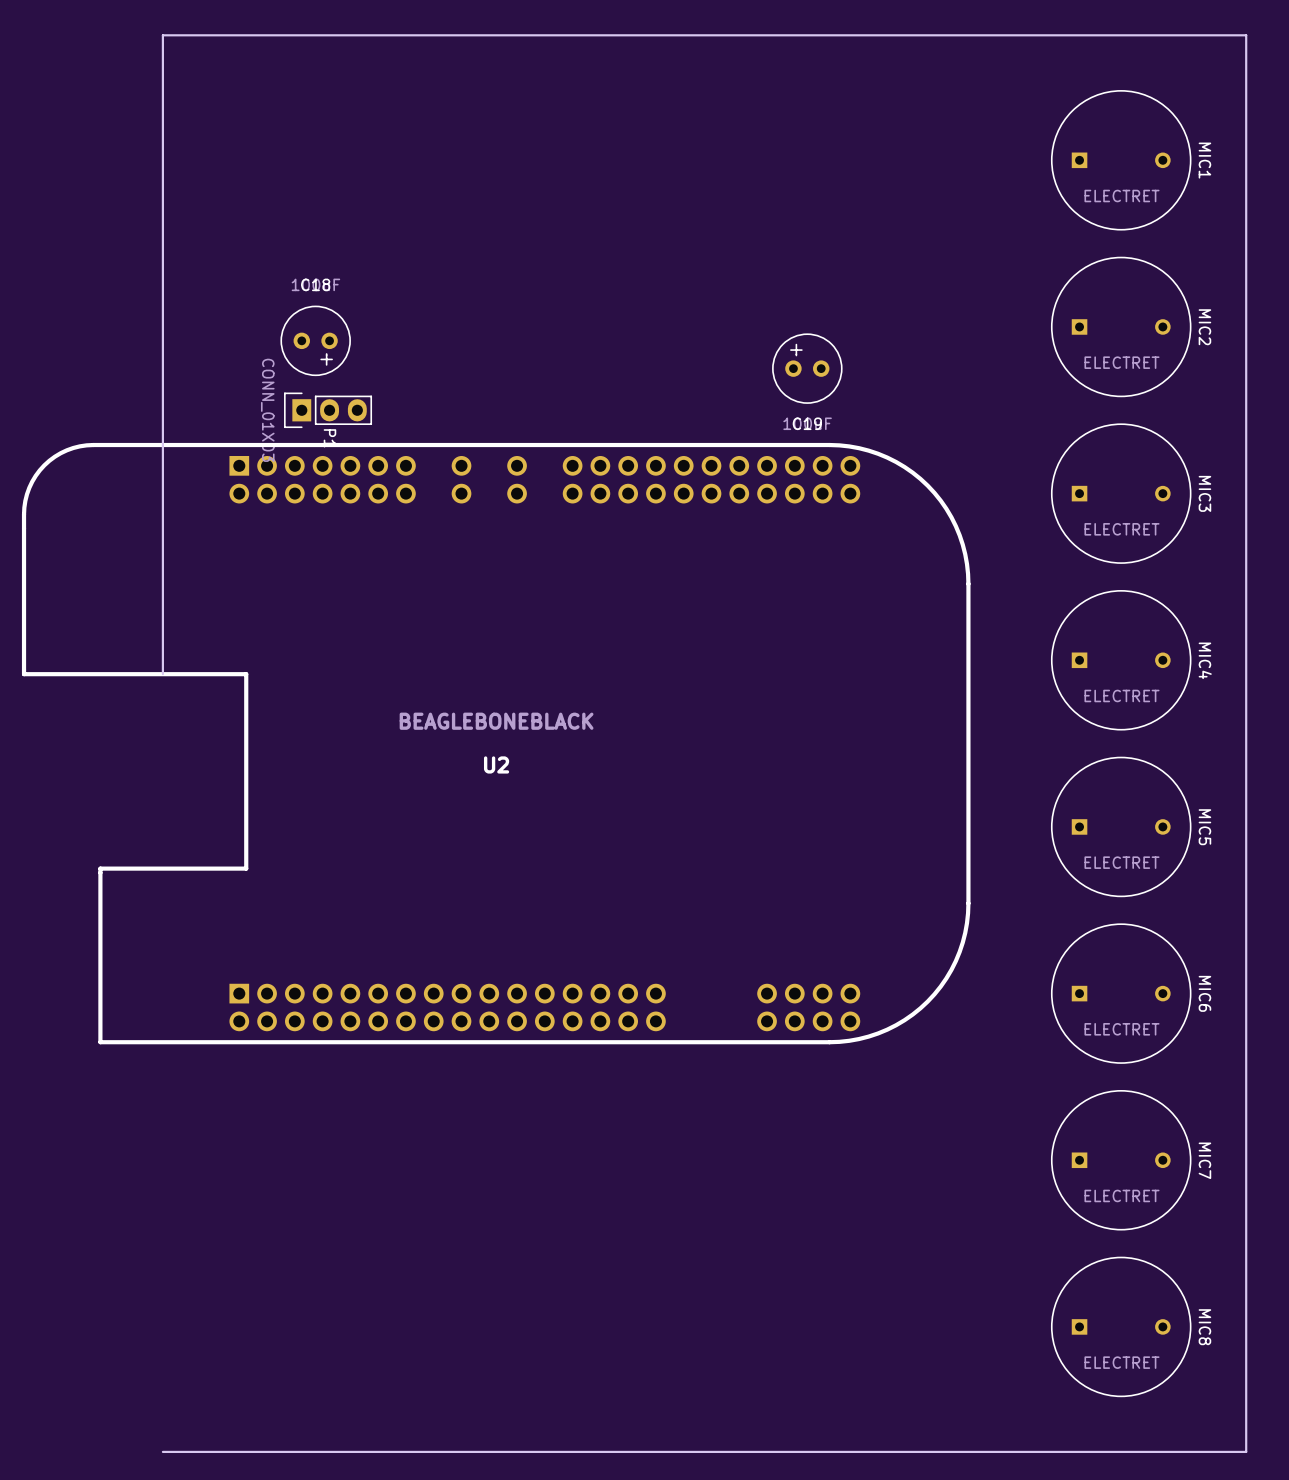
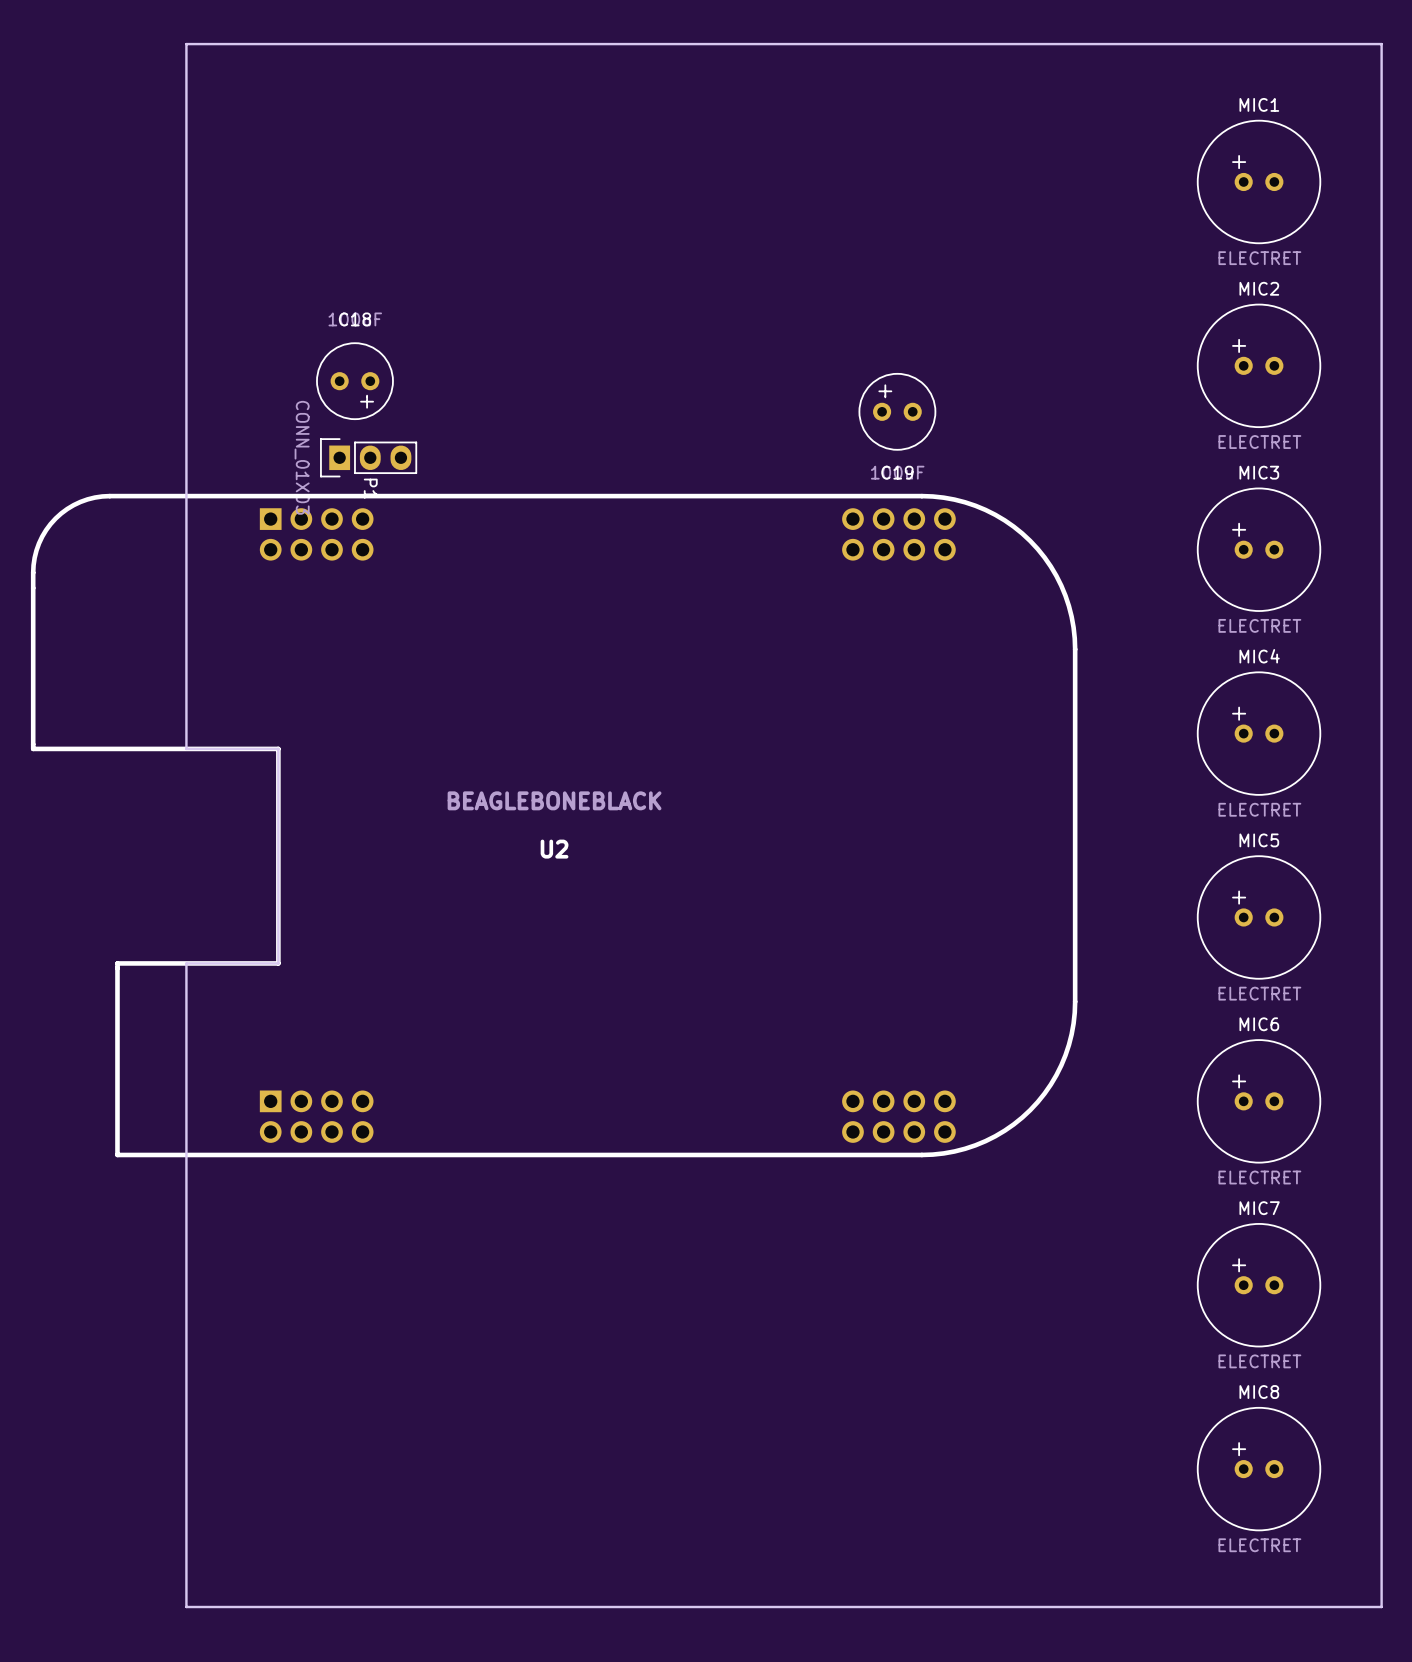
MIC1 footprint: [1050, 90, 1192, 231] -> [1196, 119, 1322, 245]
MIC1 name position: MIC1 (1204, 160) -> MIC1 (1259, 104)
MIC1 value position: ELECTRET (1121, 196) -> ELECTRET (1259, 258)
MIC2 footprint: [1050, 256, 1192, 398] -> [1196, 303, 1322, 429]
MIC2 name position: MIC2 (1204, 327) -> MIC2 (1259, 288)
MIC2 value position: ELECTRET (1121, 362) -> ELECTRET (1259, 442)
MIC3 footprint: [1050, 423, 1192, 564] -> [1196, 487, 1322, 612]
U2 footprint: [21, 442, 971, 1045] -> [30, 493, 1078, 1158]
MIC3 name position: MIC3 (1204, 493) -> MIC3 (1259, 472)
MIC3 value position: ELECTRET (1121, 529) -> ELECTRET (1259, 625)
MIC4 footprint: [1050, 590, 1192, 731] -> [1196, 671, 1322, 796]
MIC4 name position: MIC4 (1205, 660) -> MIC4 (1259, 656)
board edge: none -> (186, 748) (278, 748) (278, 963) (186, 963) (186, 1607)
MIC4 value position: ELECTRET (1121, 695) -> ELECTRET (1259, 809)
MIC5 footprint: [1050, 756, 1192, 898] -> [1196, 855, 1322, 980]
MIC5 name position: MIC5 (1204, 827) -> MIC5 (1259, 840)
MIC5 value position: ELECTRET (1121, 862) -> ELECTRET (1259, 993)
MIC6 footprint: [1050, 923, 1192, 1064] -> [1196, 1039, 1322, 1164]
MIC6 name position: MIC6 (1204, 993) -> MIC6 (1259, 1024)
MIC6 value position: ELECTRET (1121, 1029) -> ELECTRET (1259, 1177)
MIC7 footprint: [1050, 1090, 1192, 1231] -> [1196, 1223, 1322, 1348]
MIC7 name position: MIC7 (1204, 1160) -> MIC7 (1259, 1208)
MIC7 value position: ELECTRET (1121, 1195) -> ELECTRET (1259, 1361)
MIC8 footprint: [1050, 1256, 1192, 1398] -> [1196, 1406, 1322, 1532]
MIC8 name position: MIC8 (1204, 1327) -> MIC8 (1259, 1392)
MIC8 value position: ELECTRET (1121, 1362) -> ELECTRET (1259, 1545)

